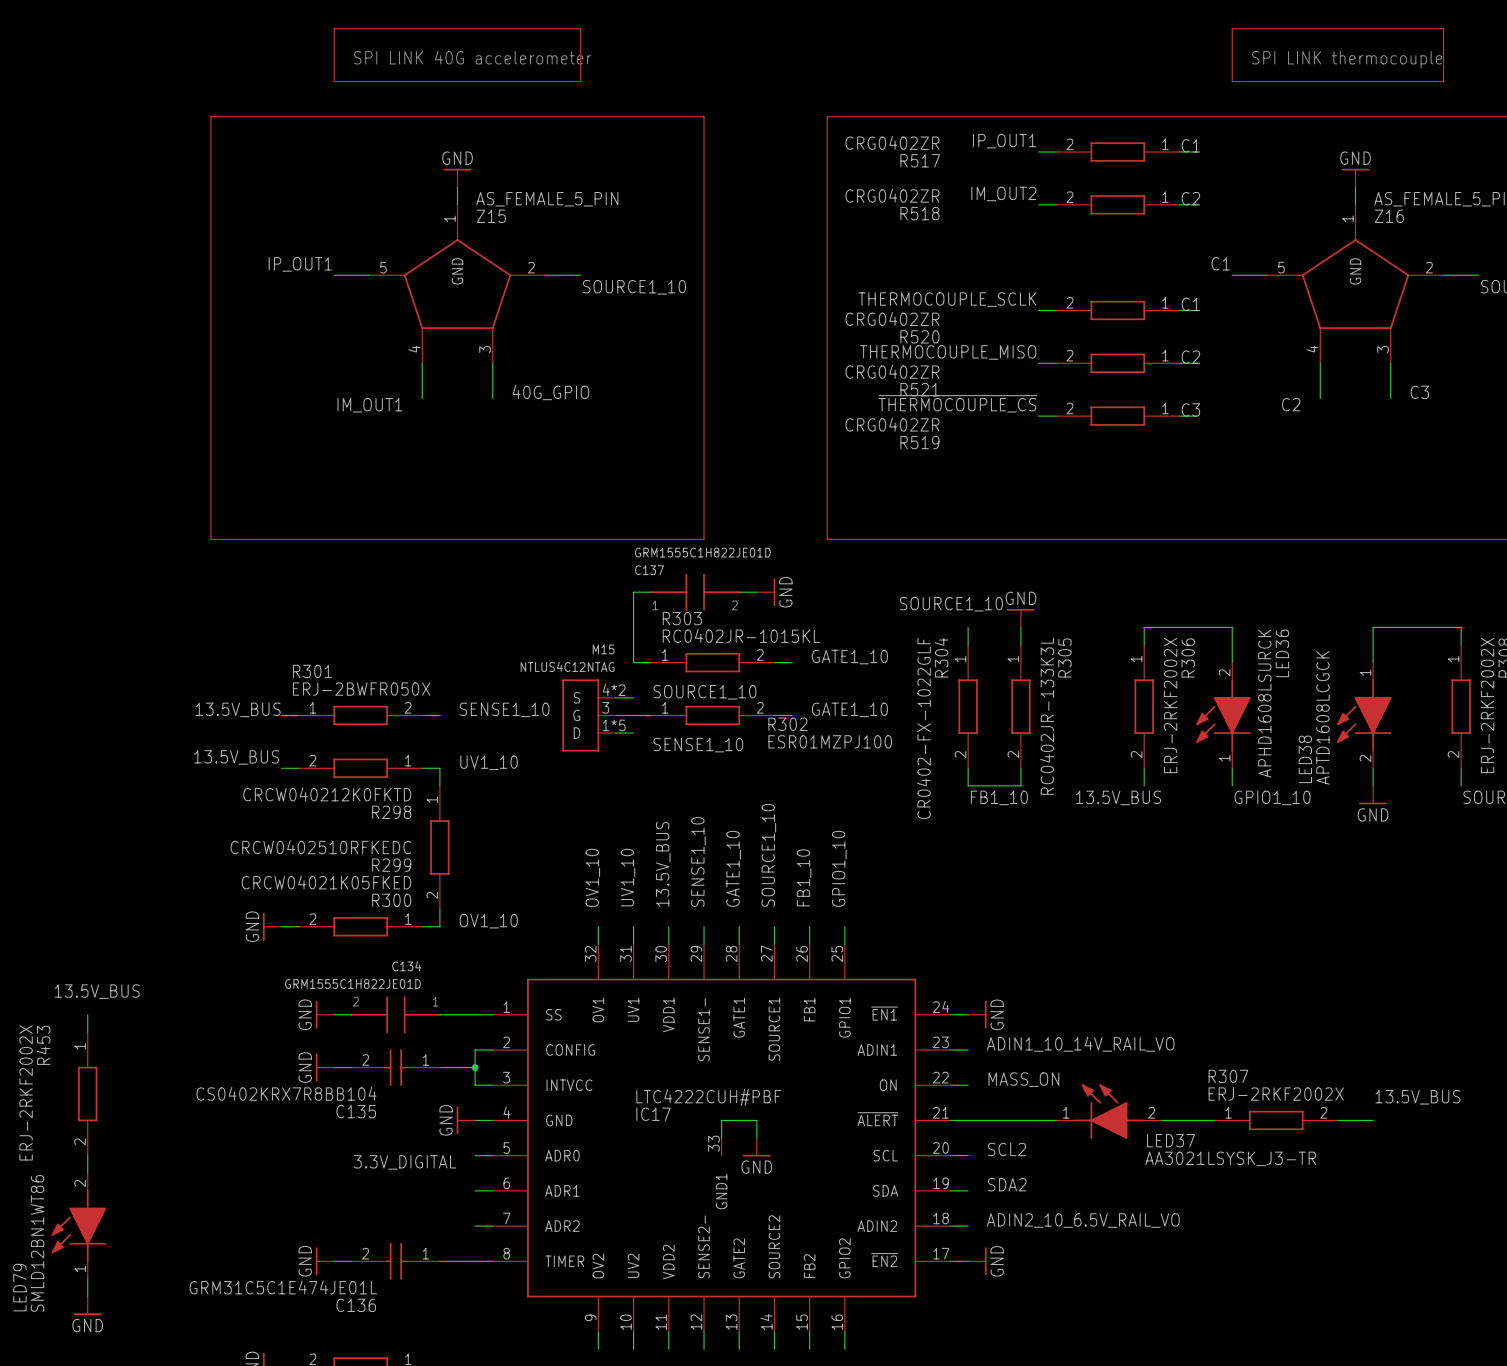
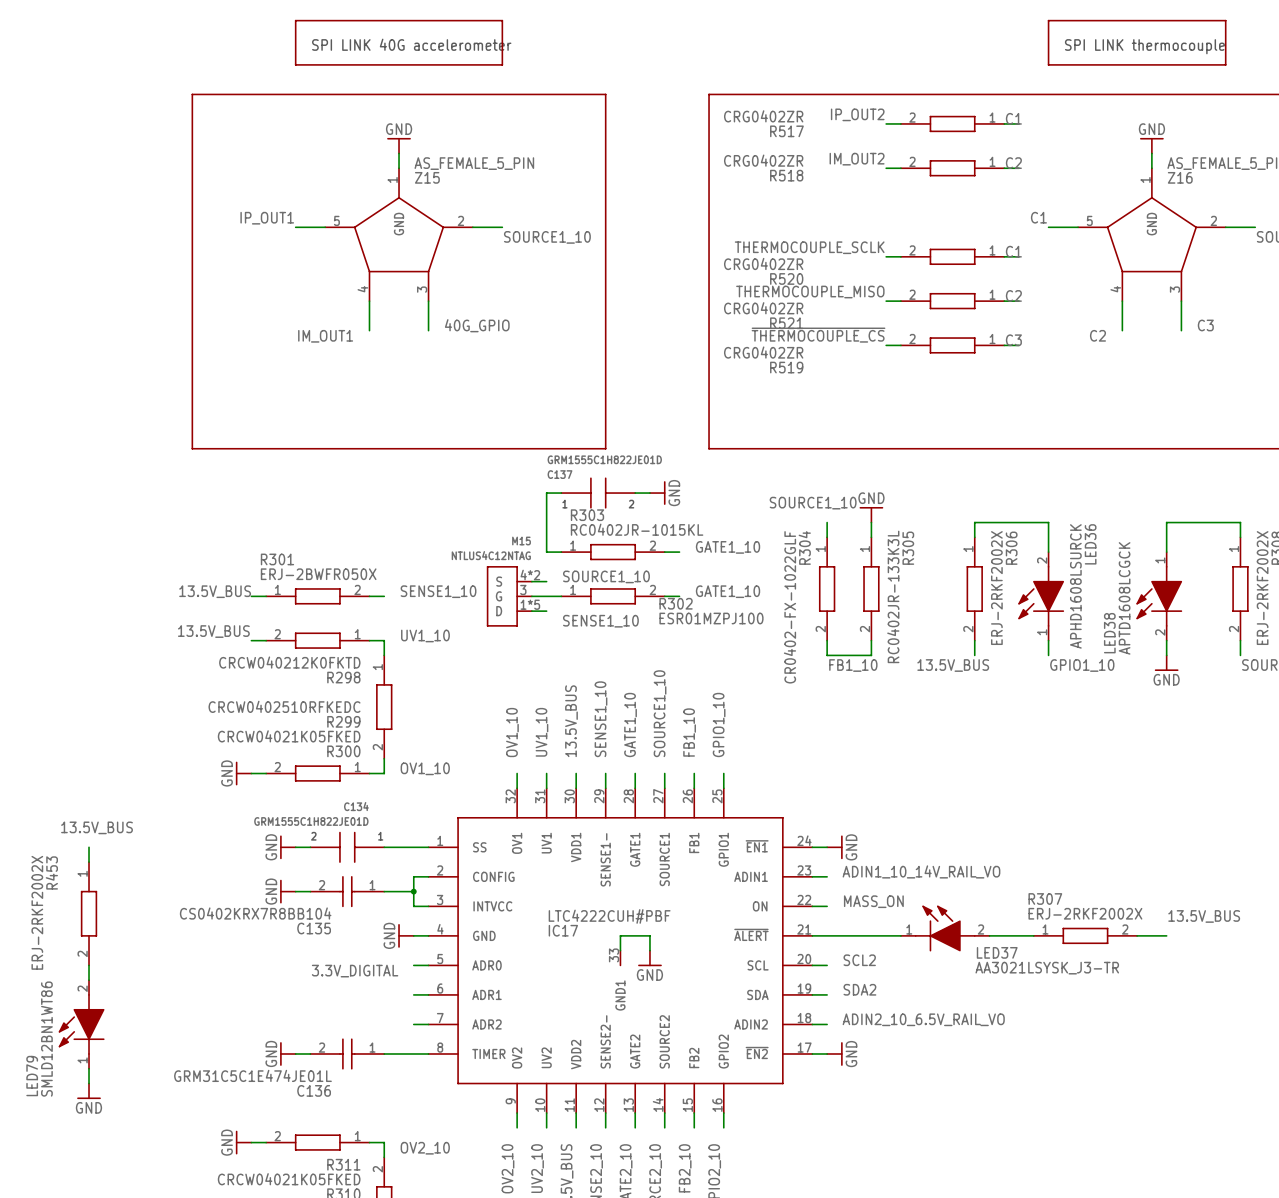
label: IP_OUT1 (1004, 141) -> IP_OUT2 (857, 114)

